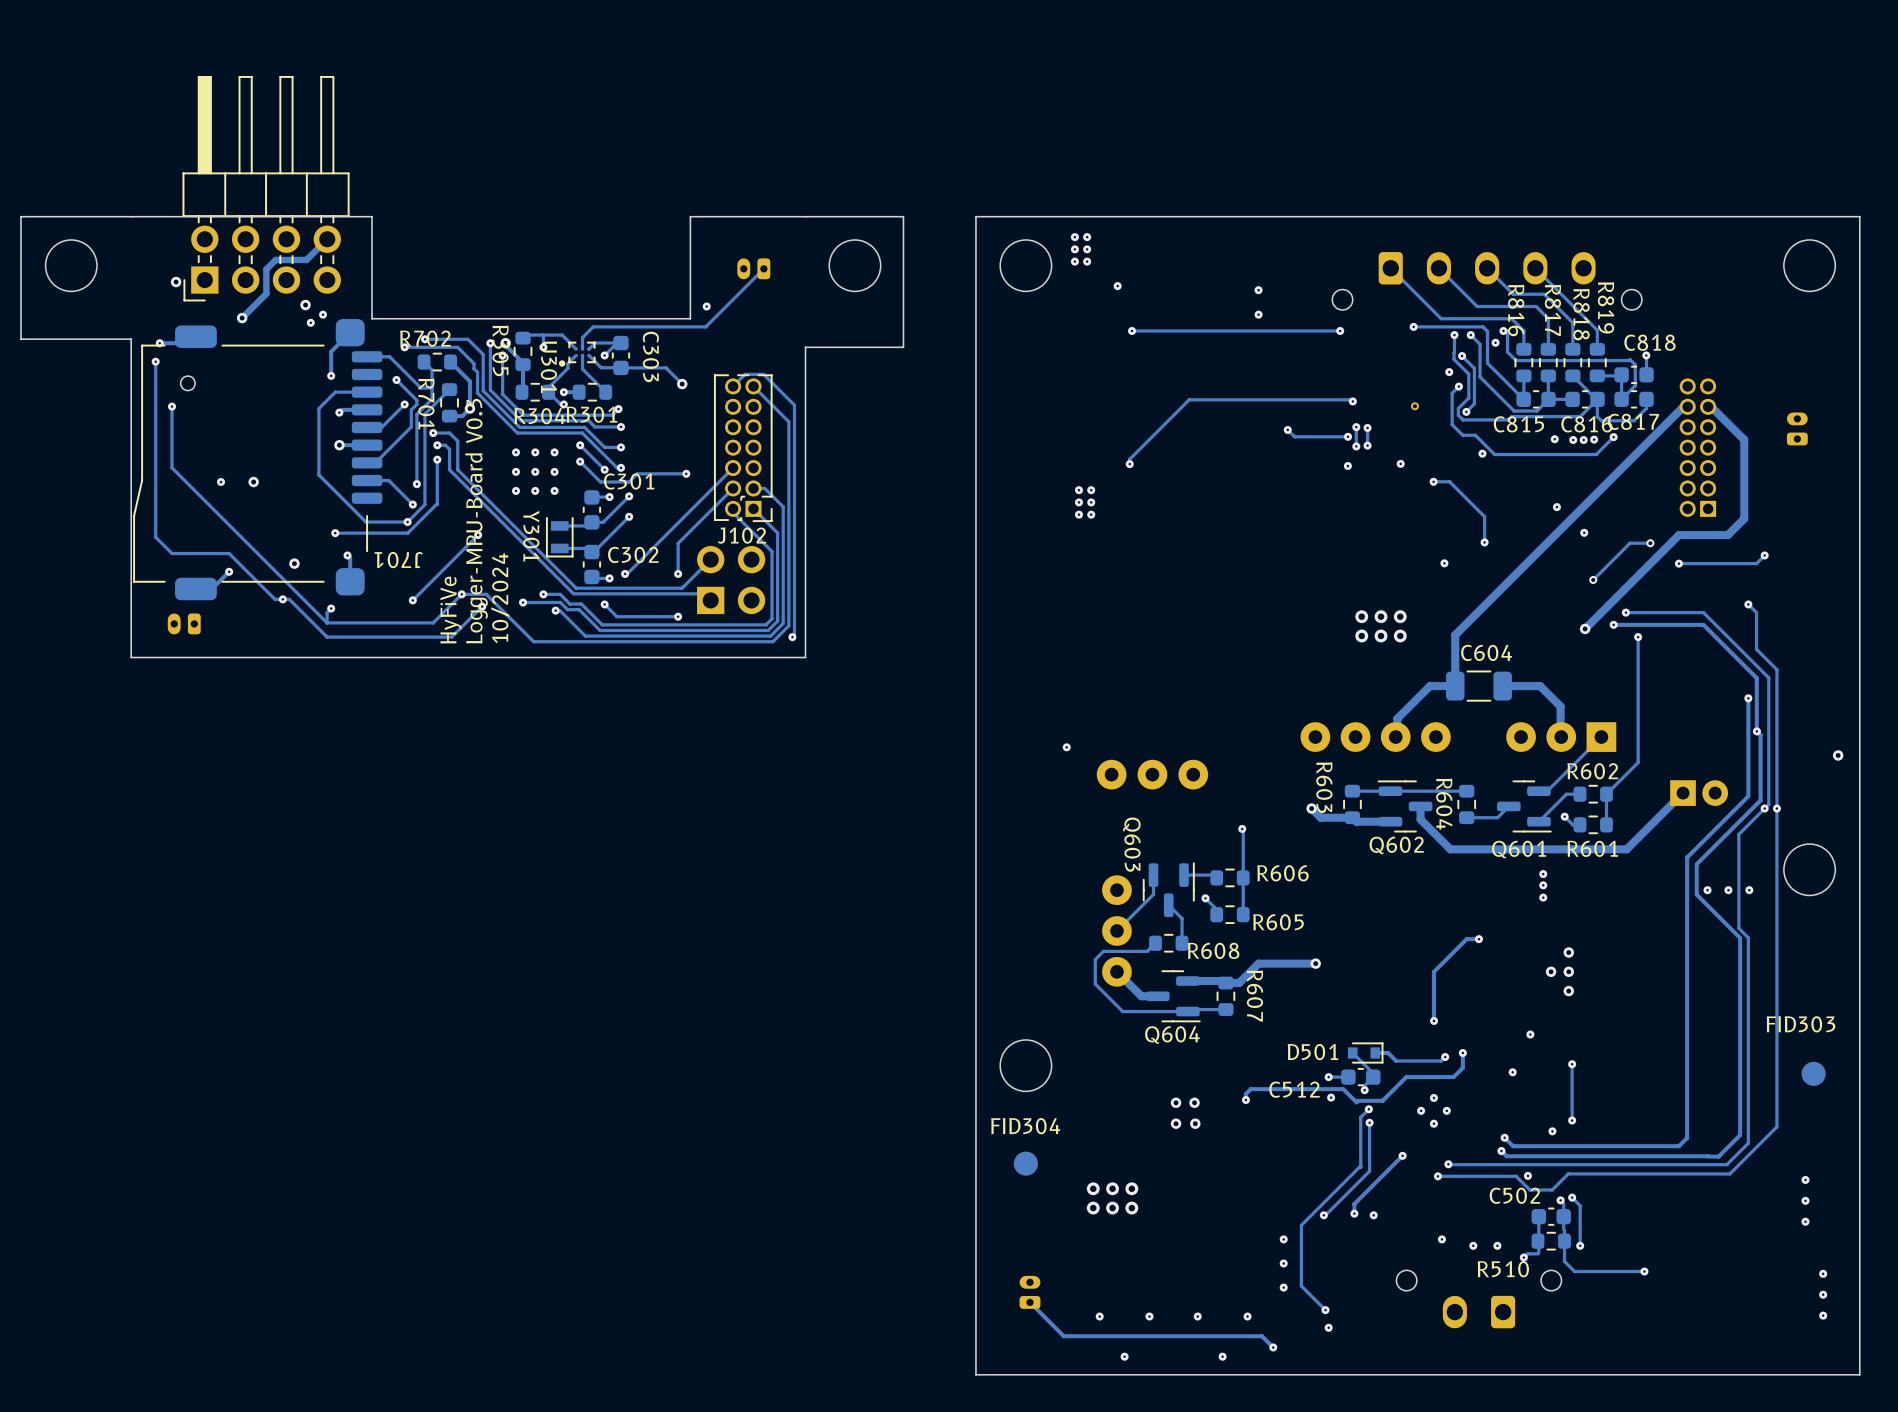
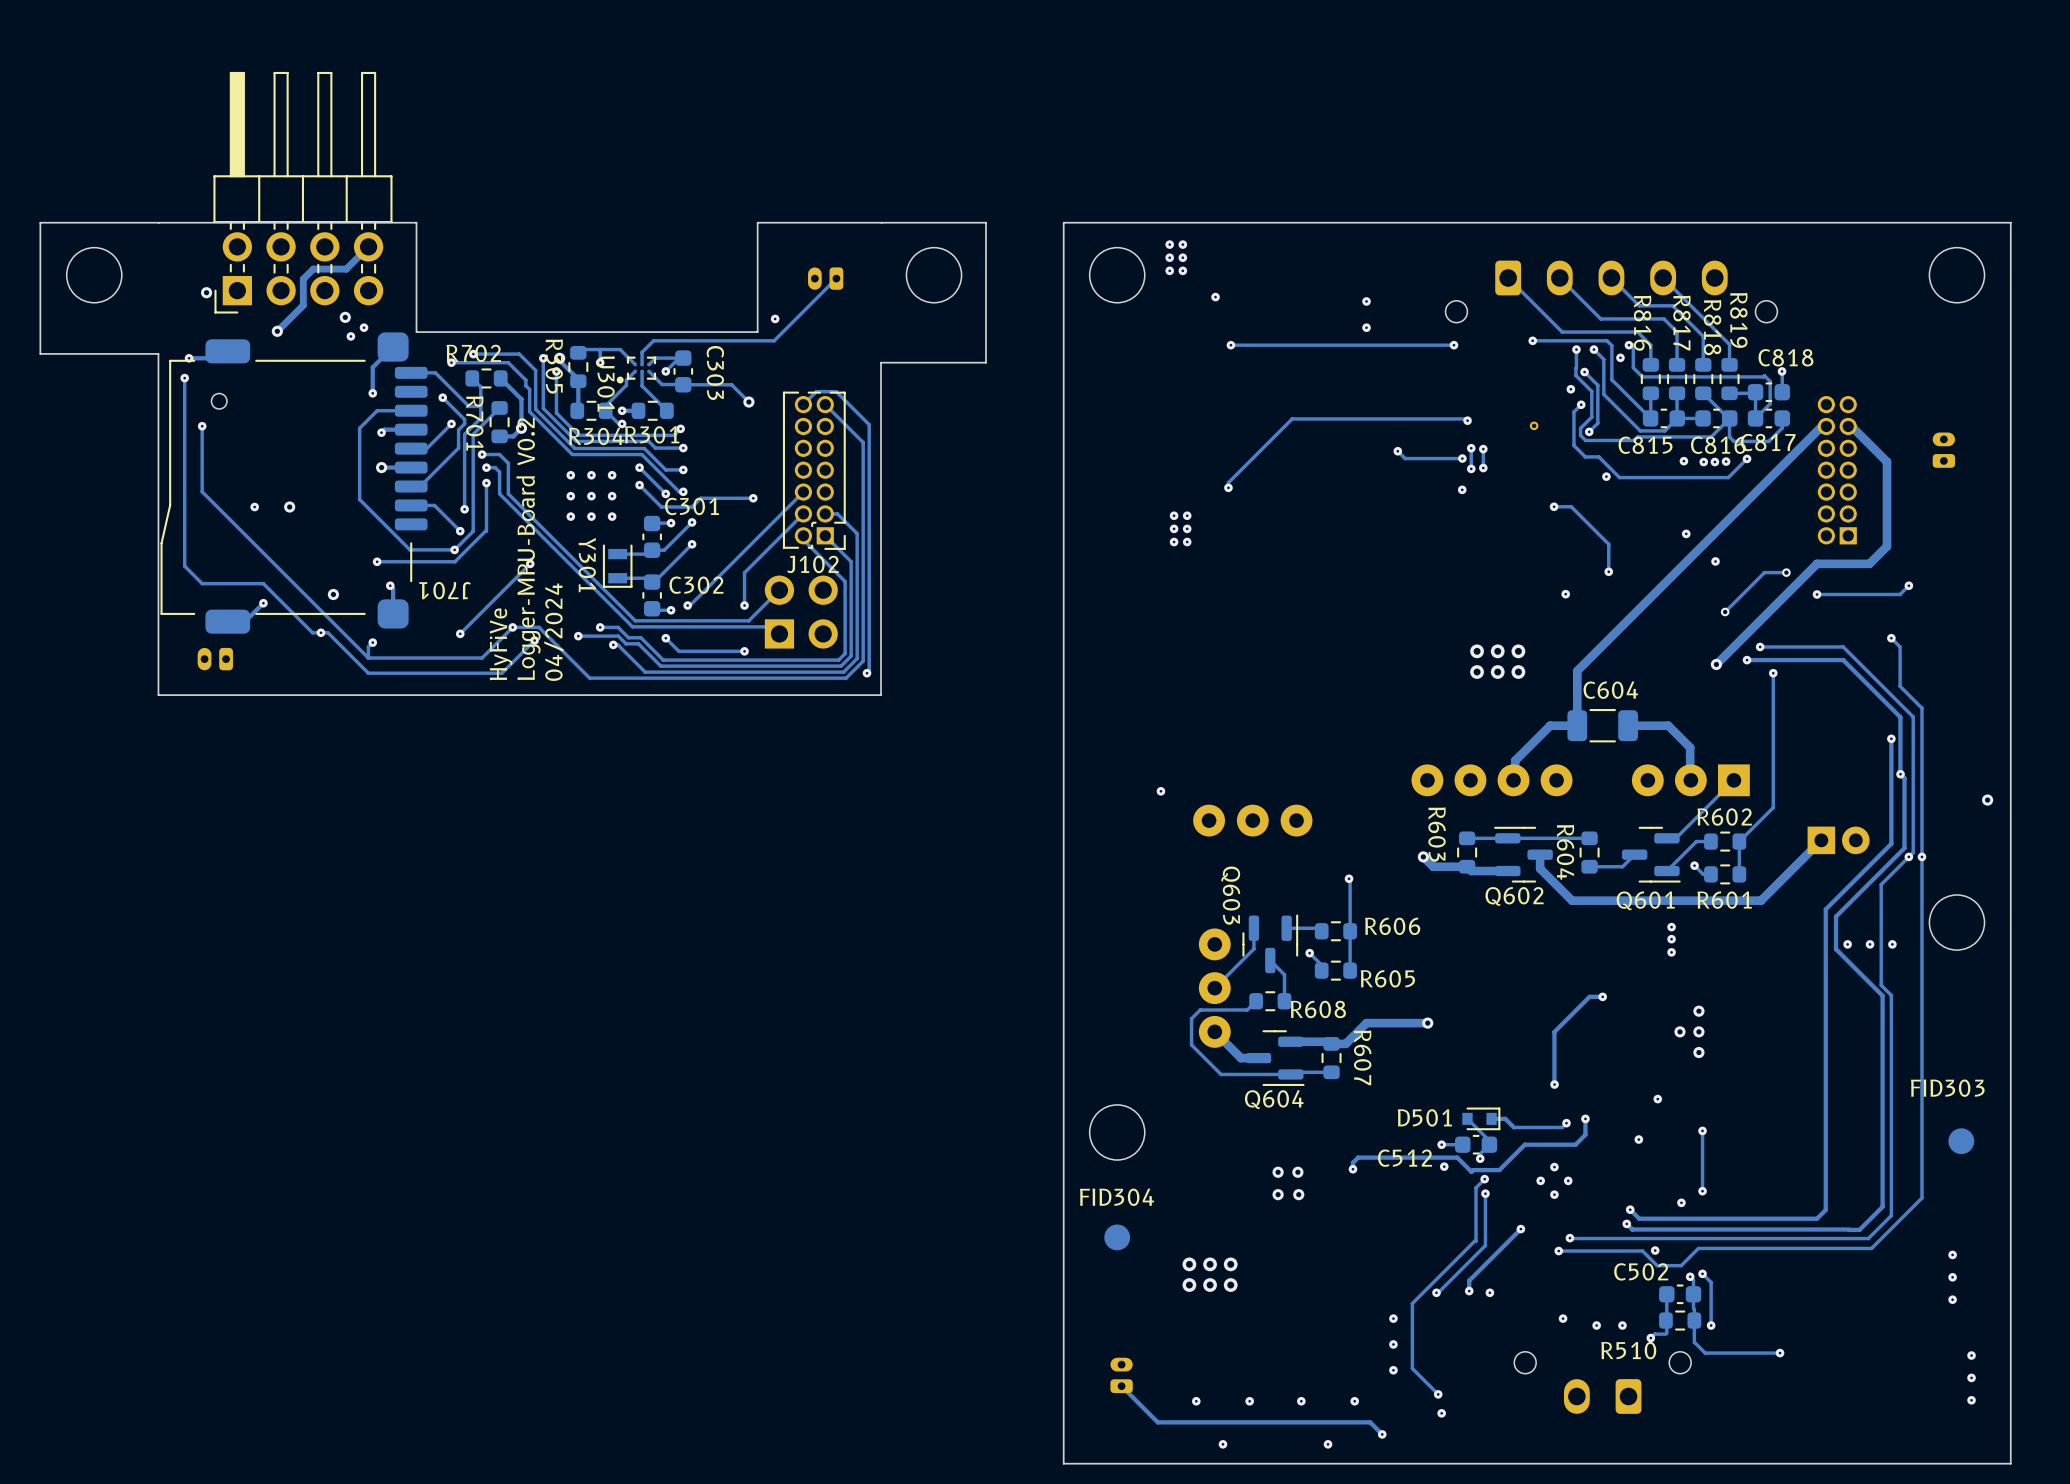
via: (1400, 463) -> none
text: Logger-MPU-Board V0.3 (476, 521) -> Logger-MPU-Board V0.2 (528, 549)
text: 10/2024 (500, 598) -> 04/2024 (553, 632)

